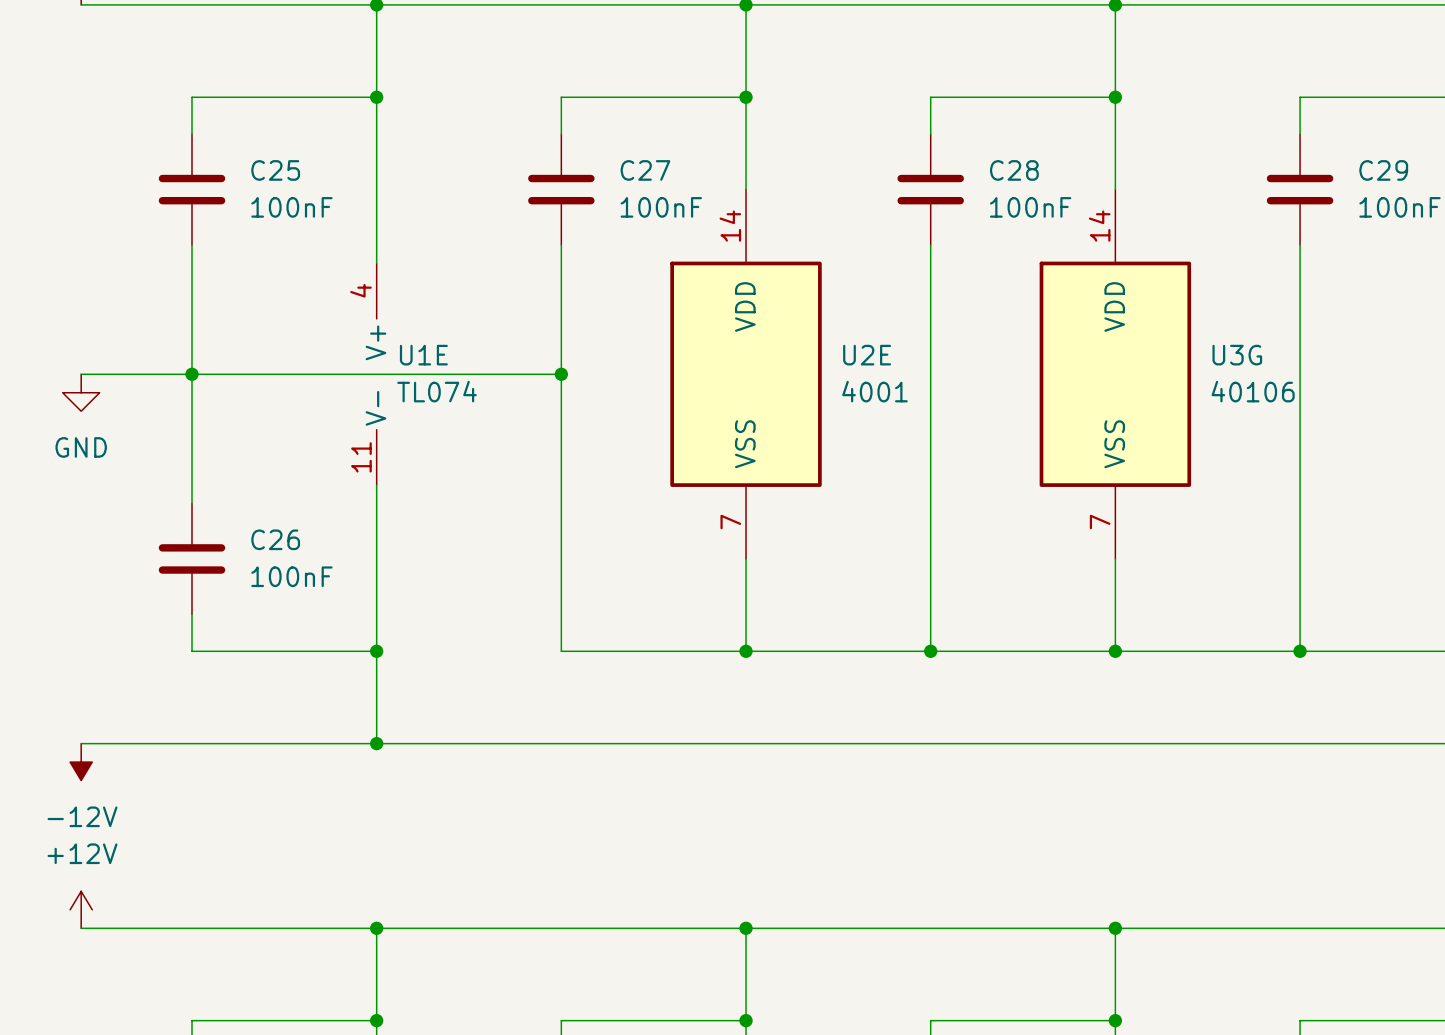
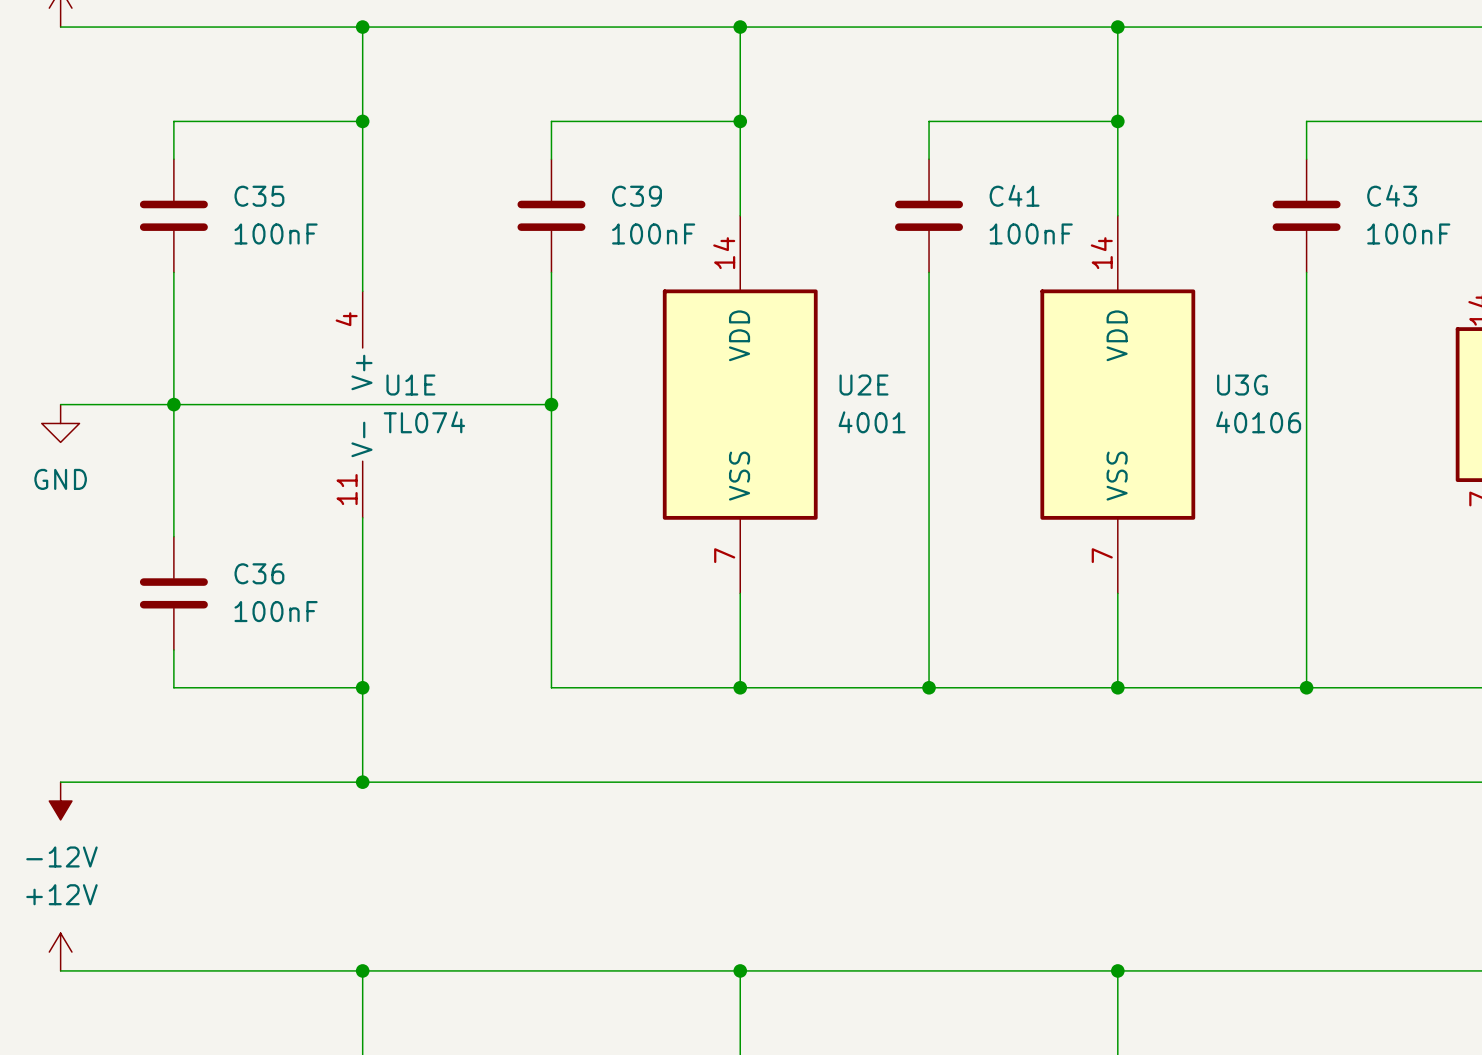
C25 name: C25 (275, 170) -> C35 (259, 196)
C27 name: C27 (645, 170) -> C39 (637, 196)
C28 name: C28 (1014, 170) -> C41 (1014, 195)
C29 name: C29 (1383, 170) -> C43 (1392, 195)
C26 name: C26 (275, 539) -> C36 (259, 573)

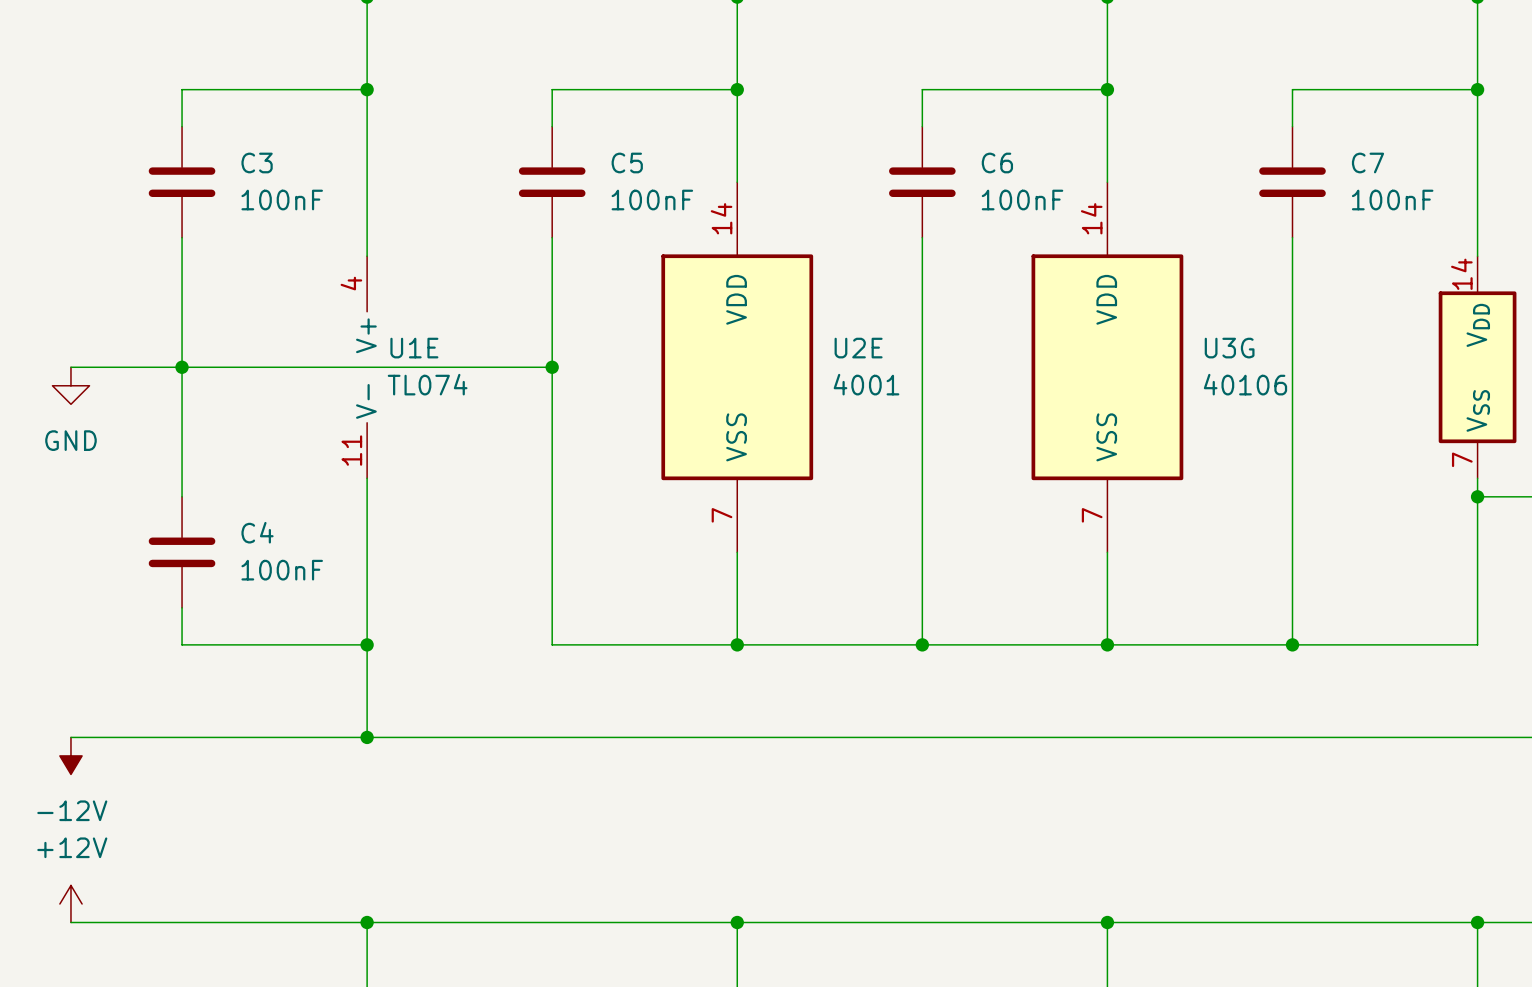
C41 name: C41 (1014, 195) -> C6 (997, 162)
C43 name: C43 (1392, 195) -> C7 (1367, 162)
C35 name: C35 (259, 196) -> C3 (257, 162)
C39 name: C39 (637, 196) -> C5 (627, 162)
C36 name: C36 (259, 573) -> C4 (257, 532)

